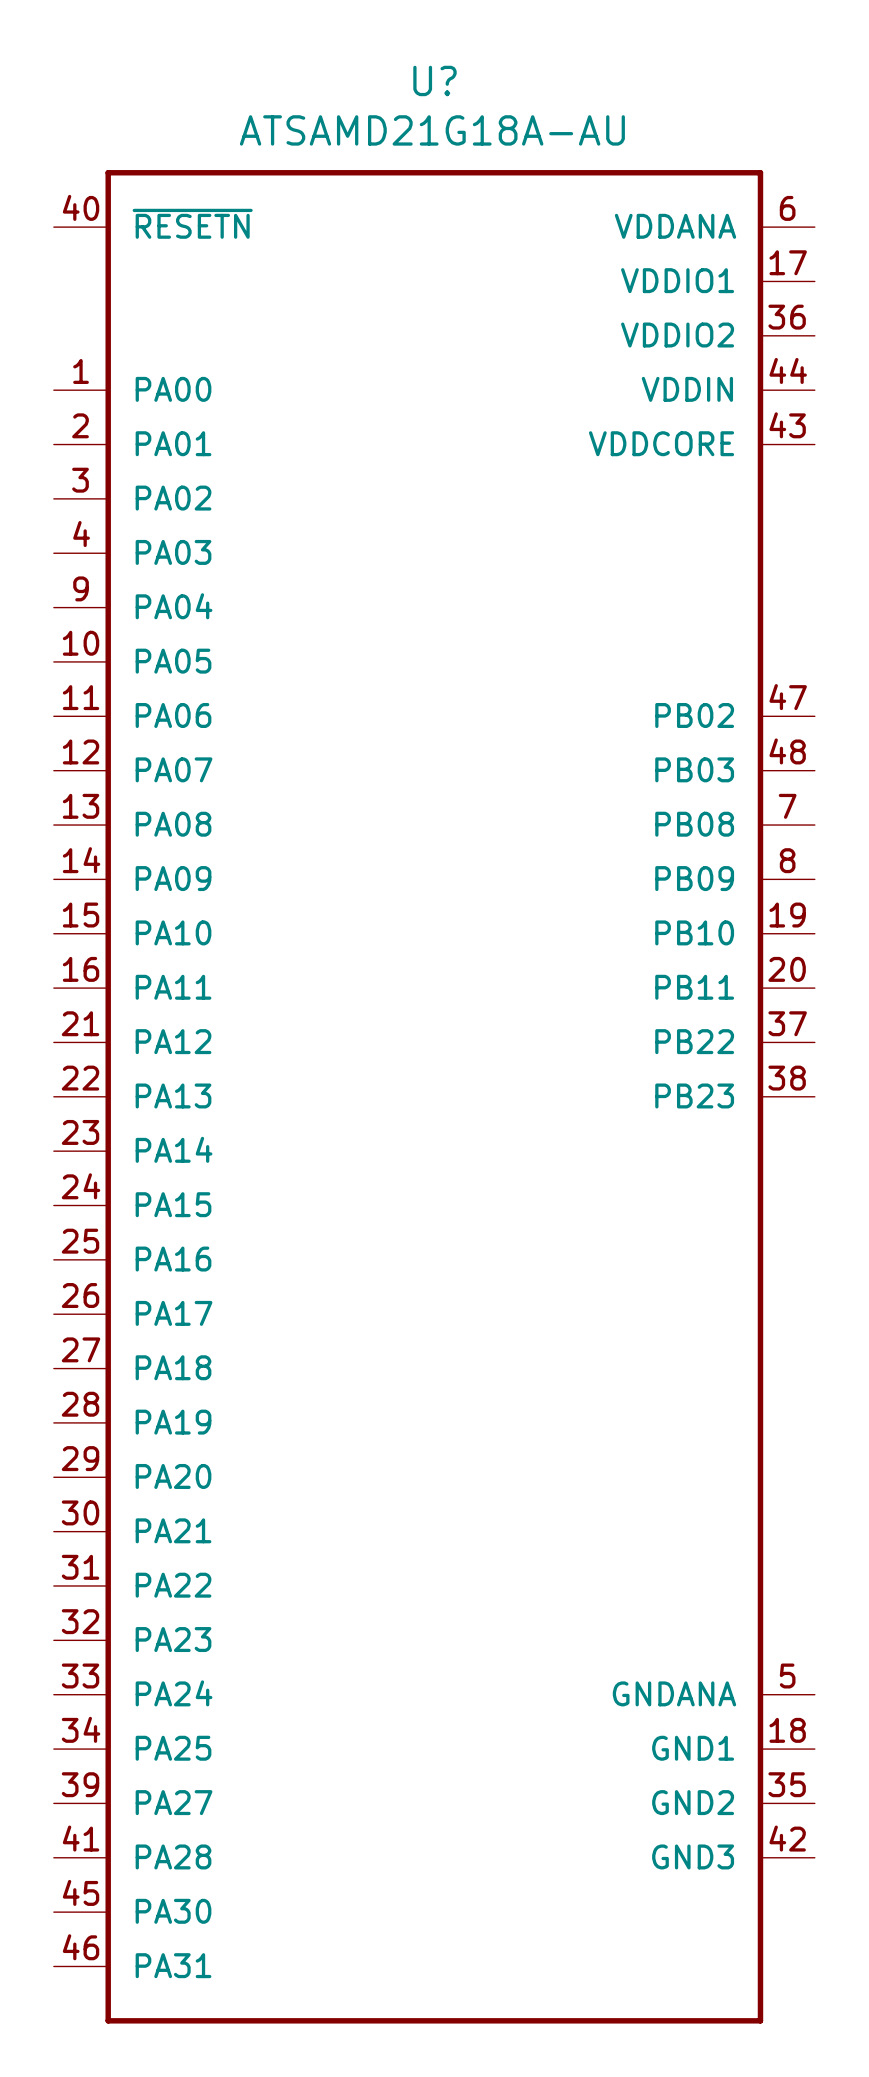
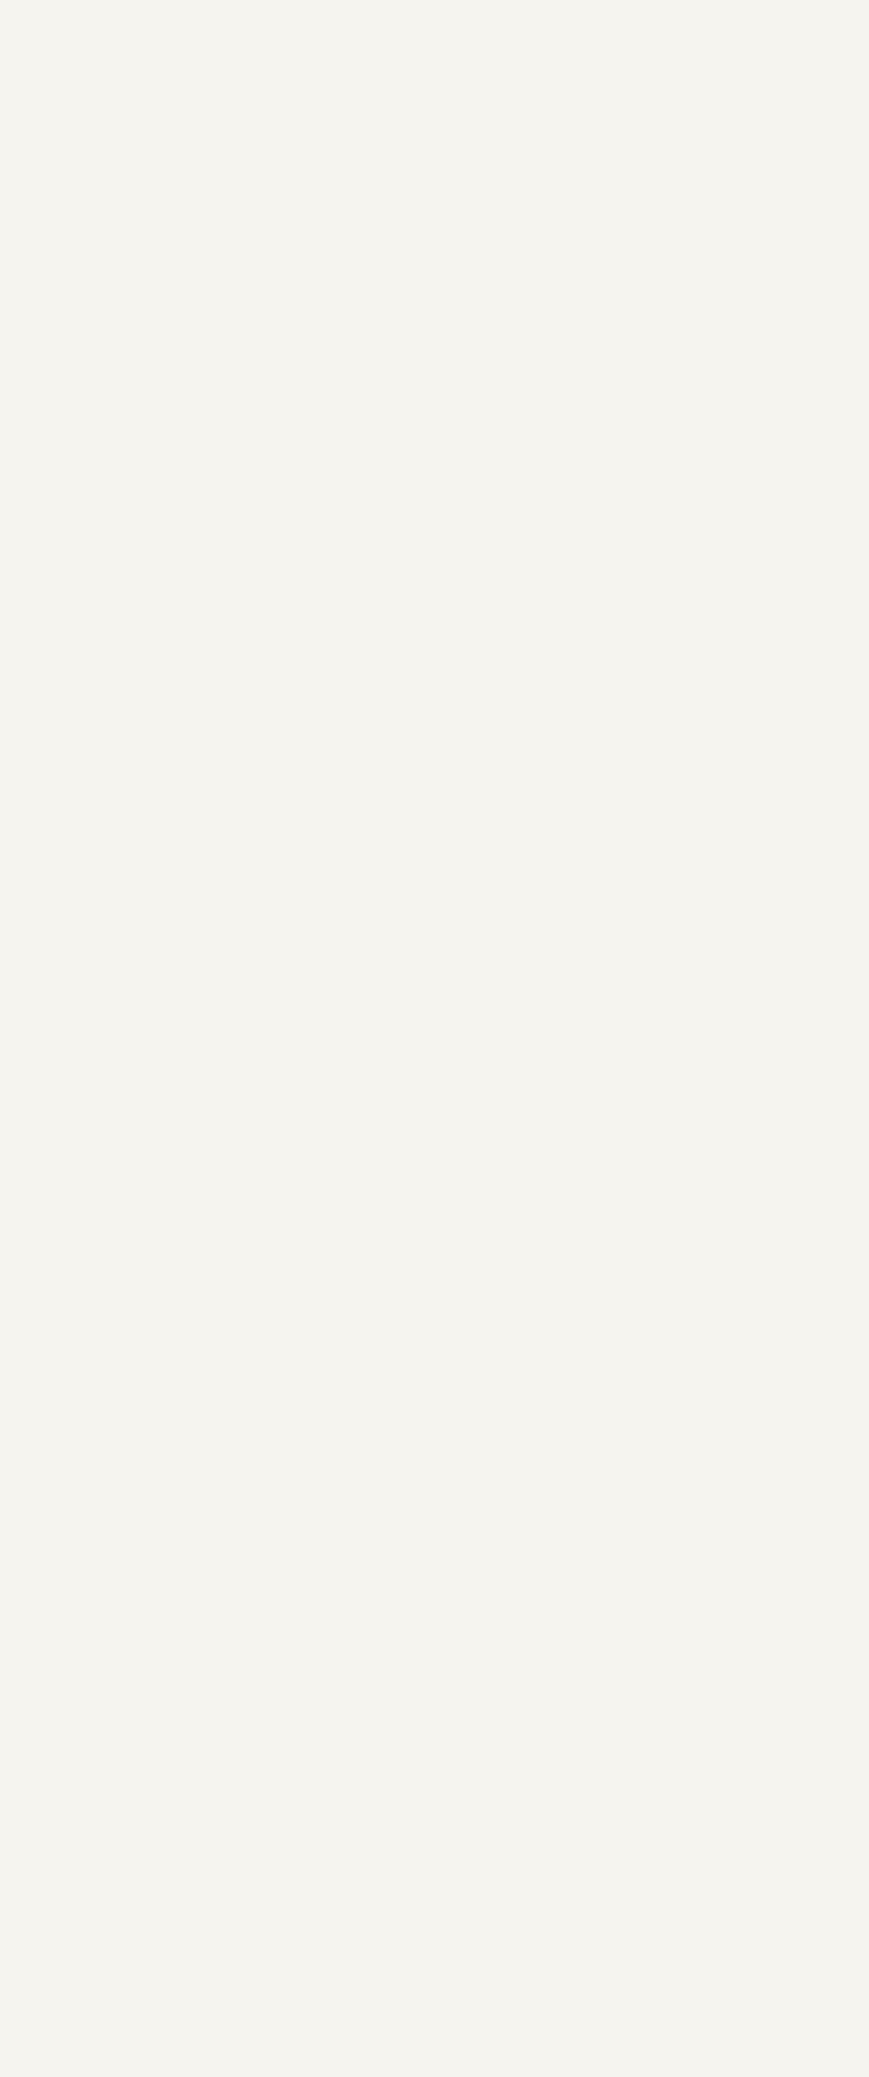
U?: ATSAMD21G18A-AU (434, 1096) -> none

